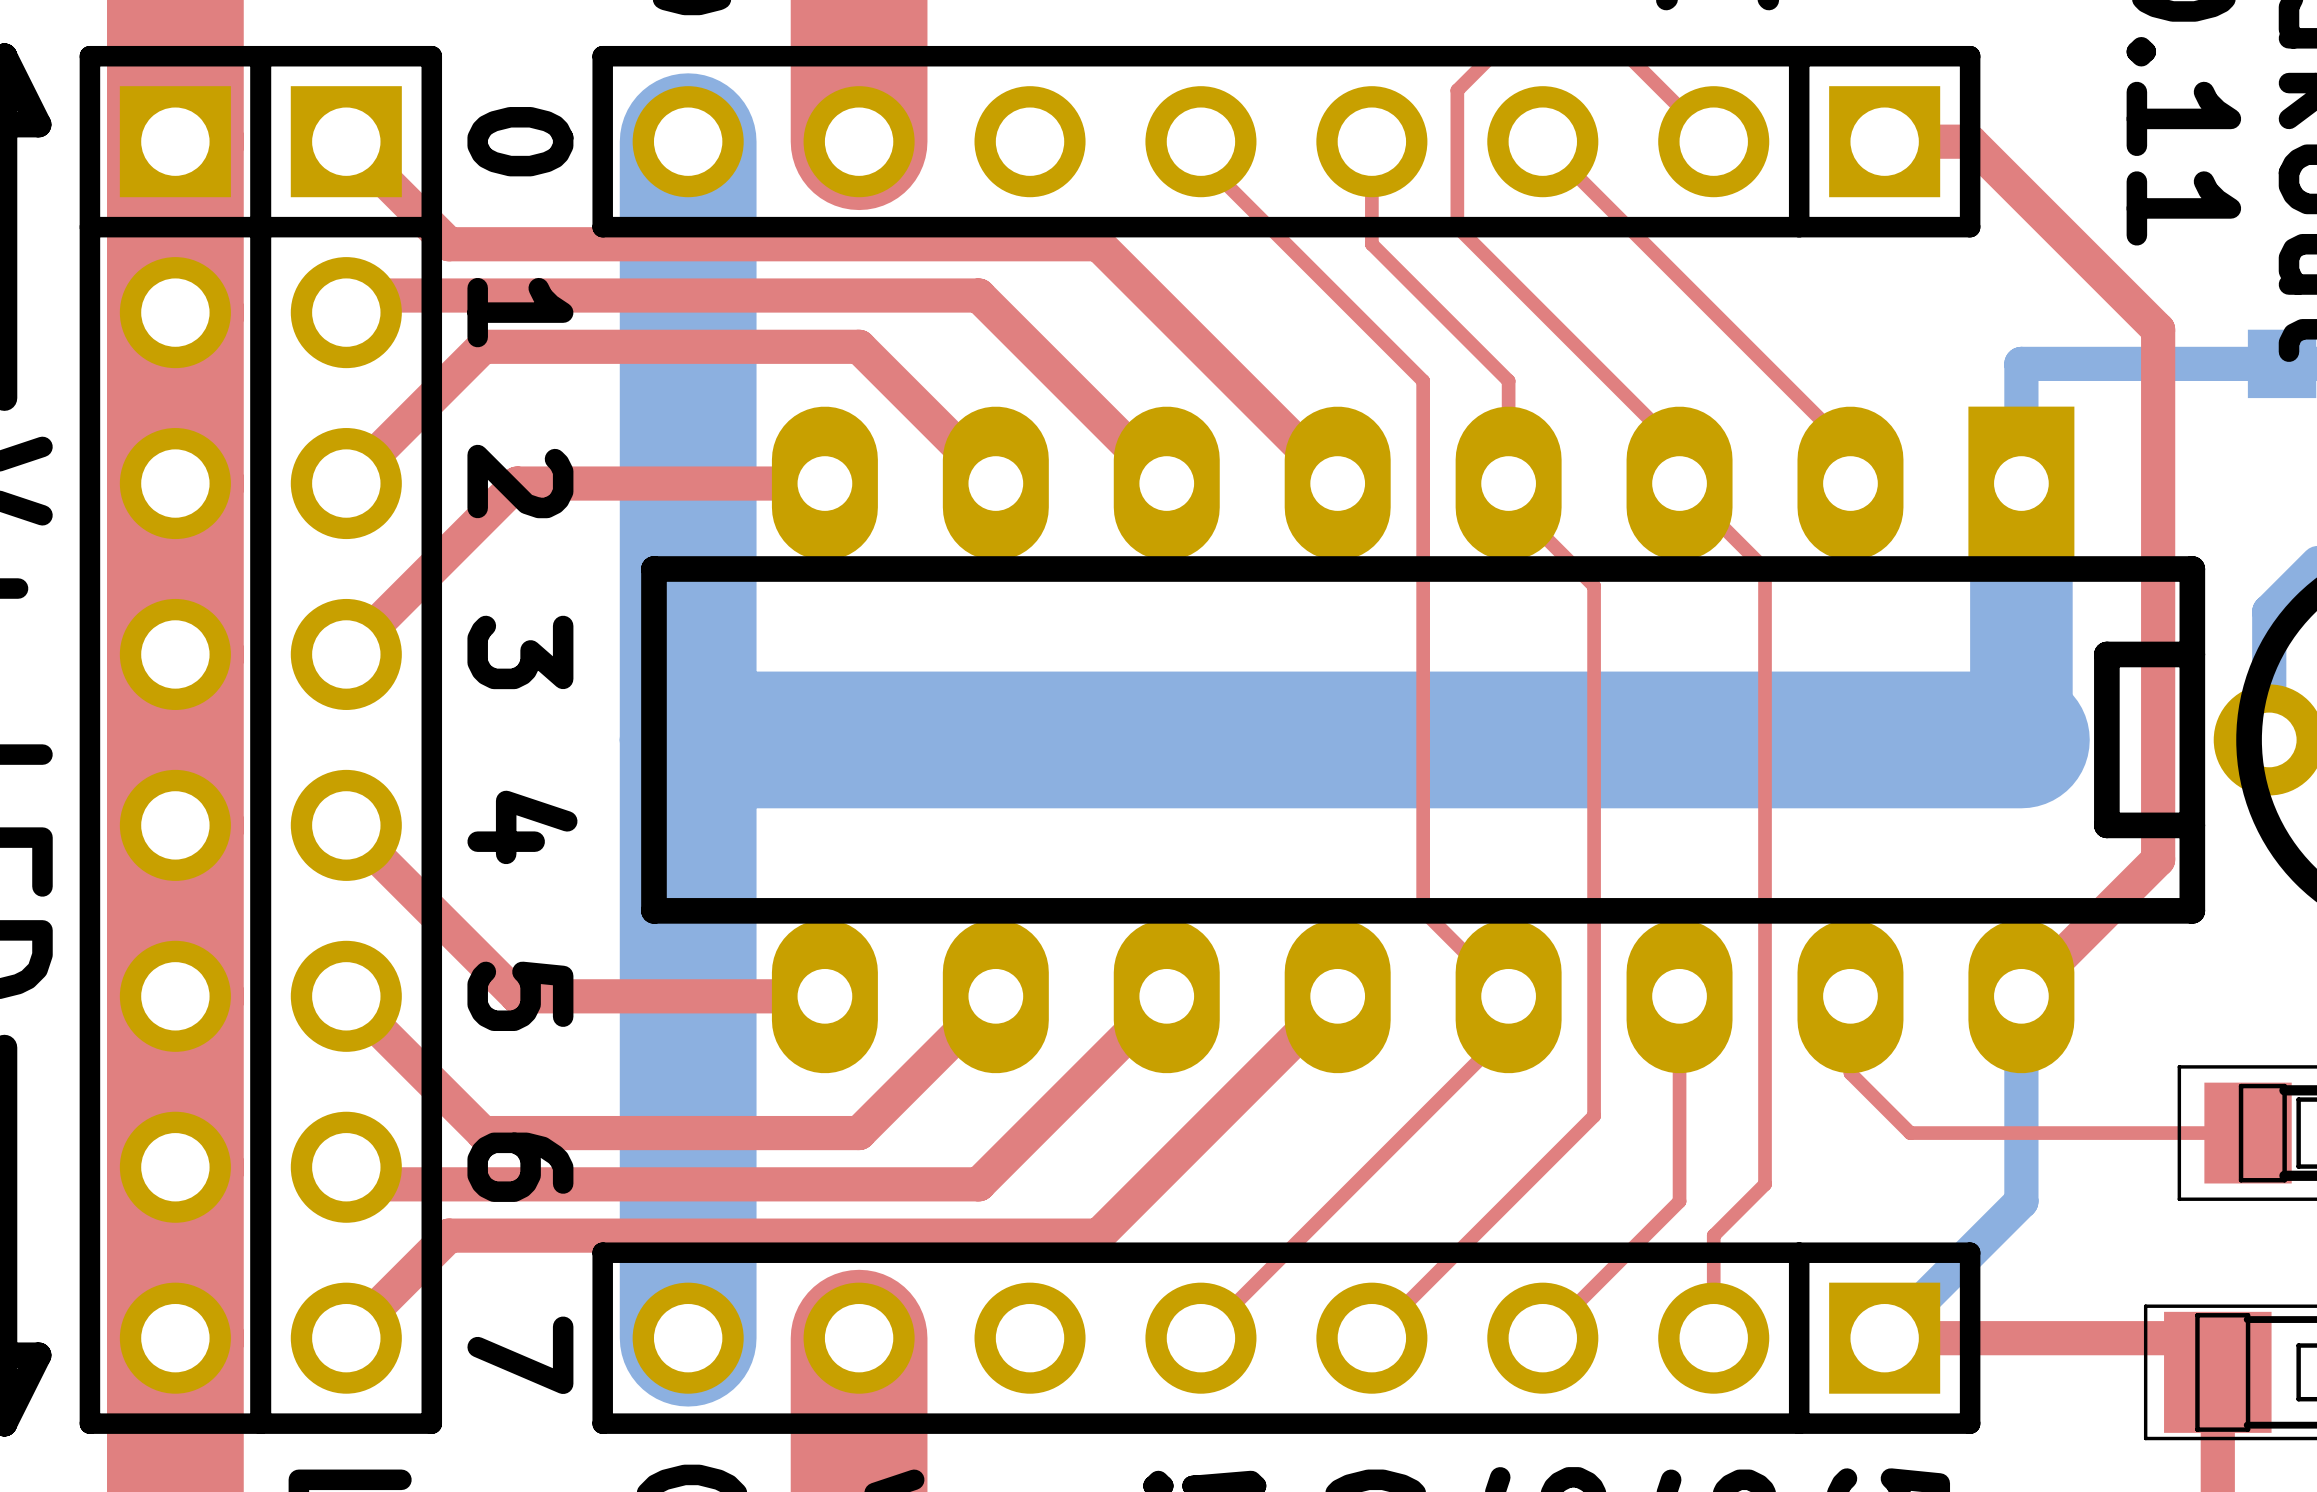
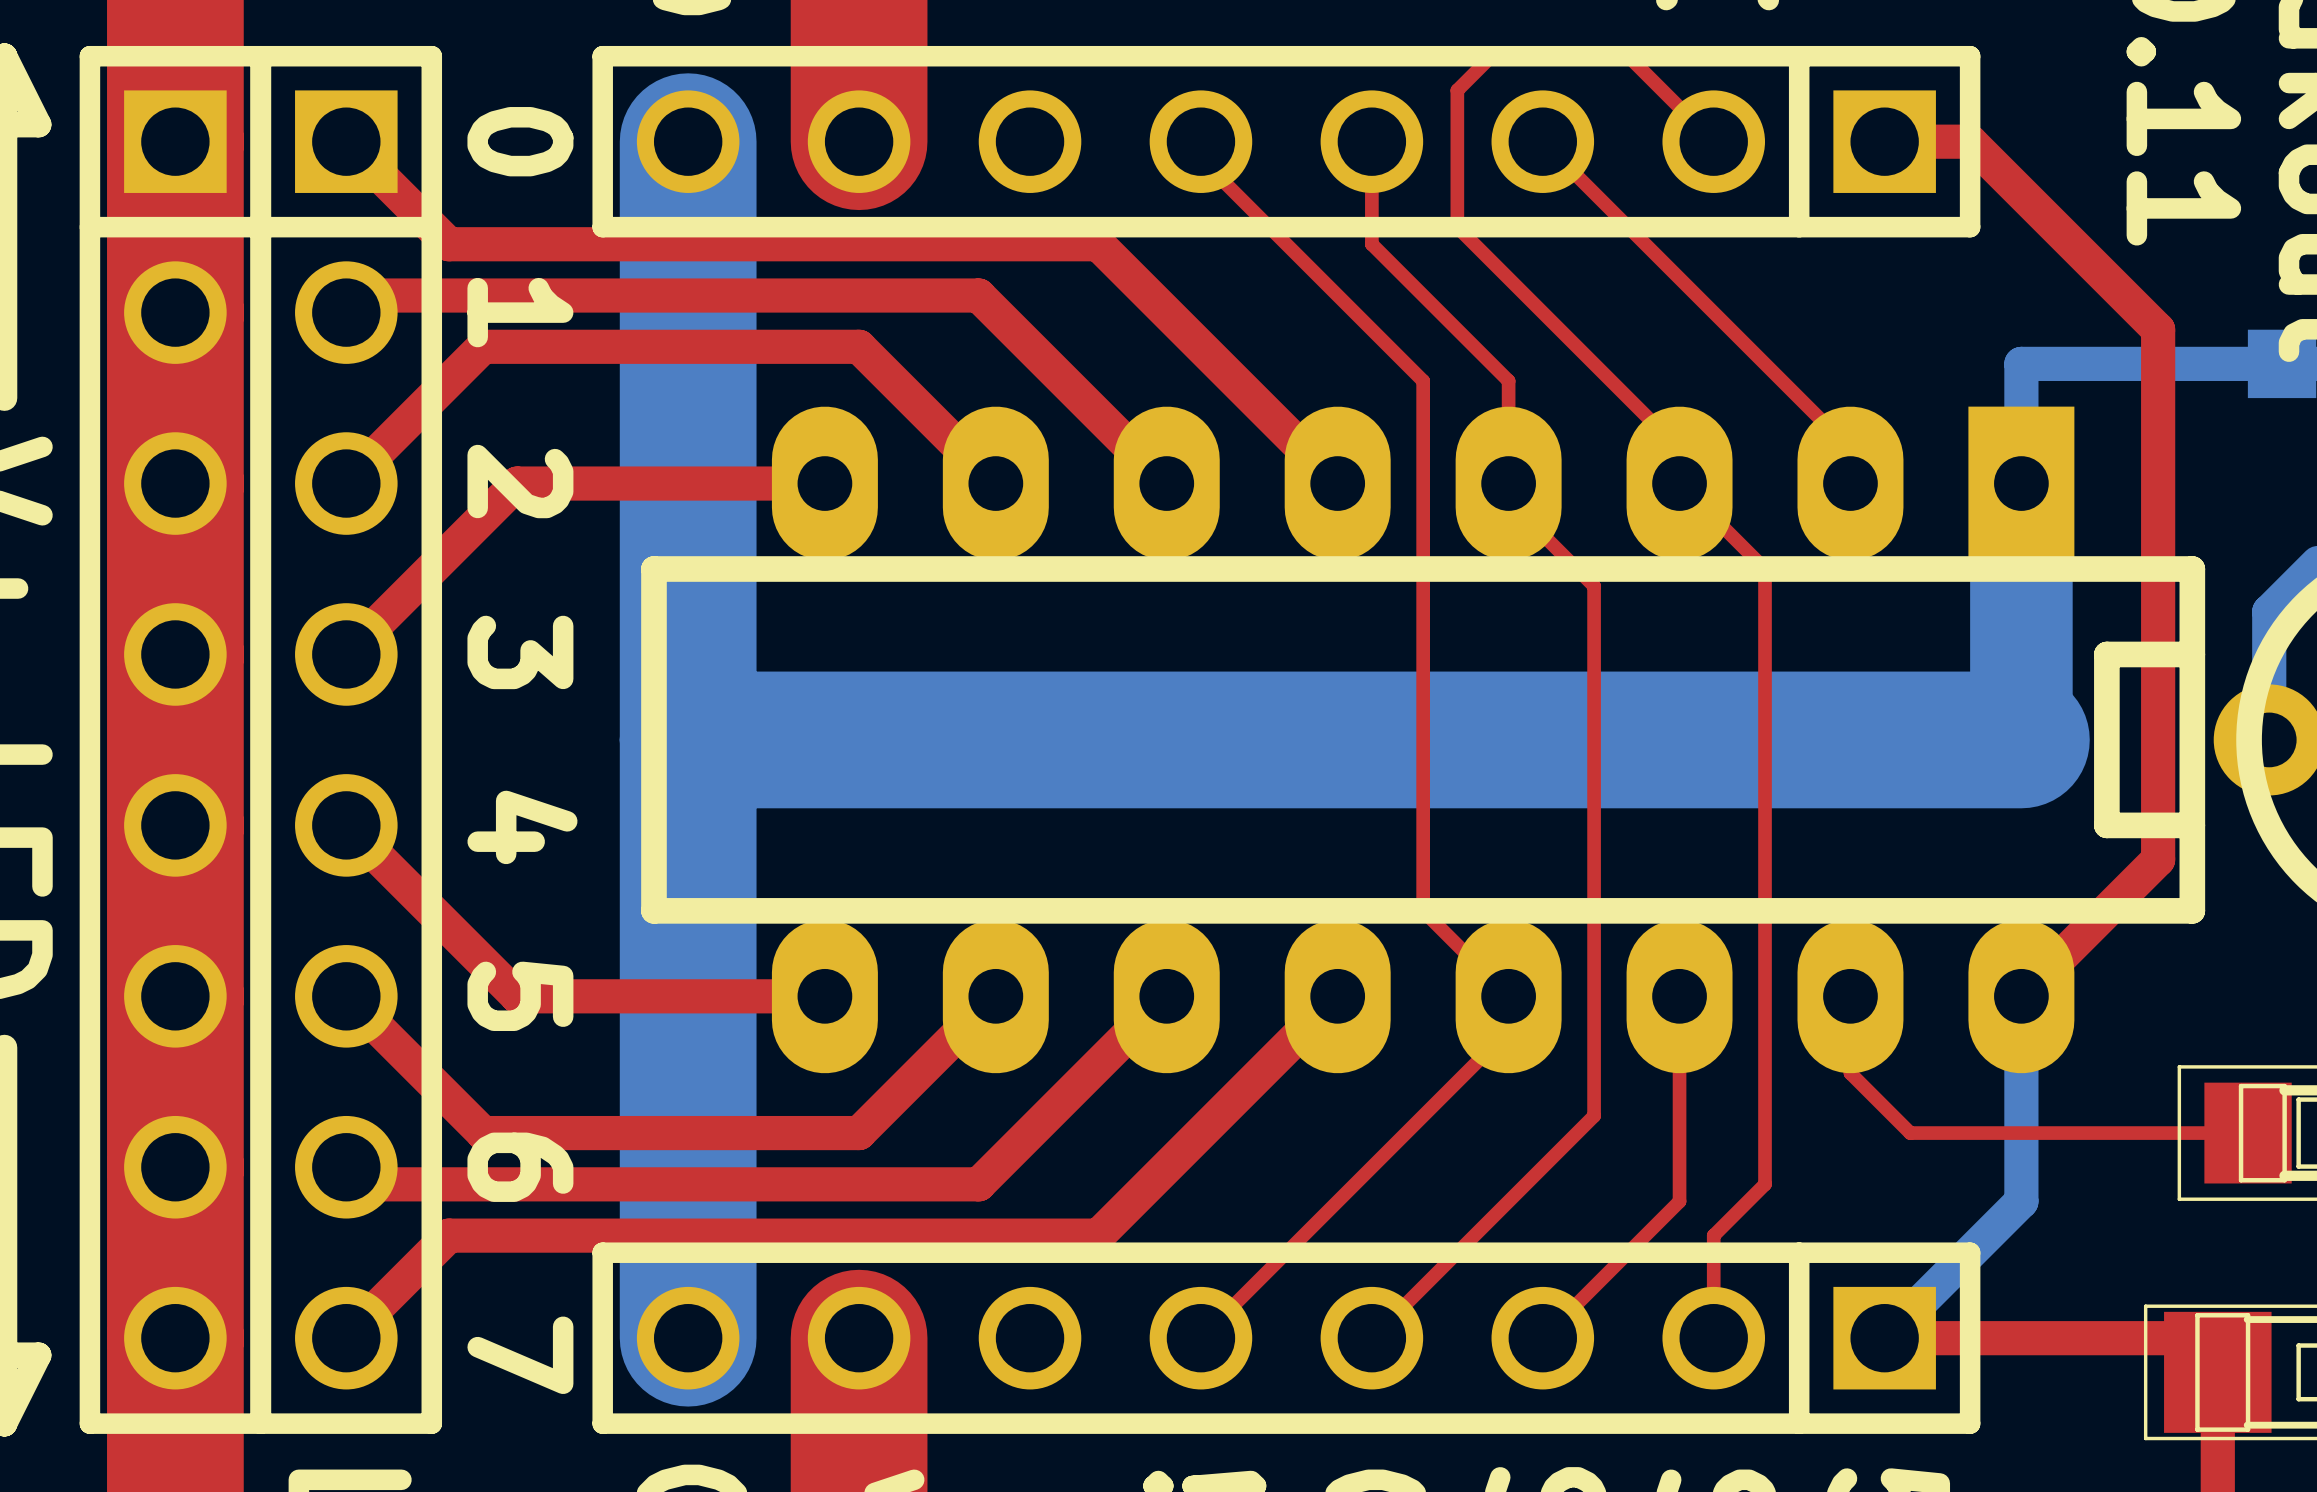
part footprint: [79, 45, 272, 1434] -> [79, 45, 272, 1434]
part footprint: [250, 45, 443, 1434] -> [250, 45, 443, 1434]
part footprint: [592, 45, 1981, 238] -> [592, 45, 1981, 238]
part footprint: [592, 1242, 1981, 1434] -> [592, 1242, 1981, 1434]

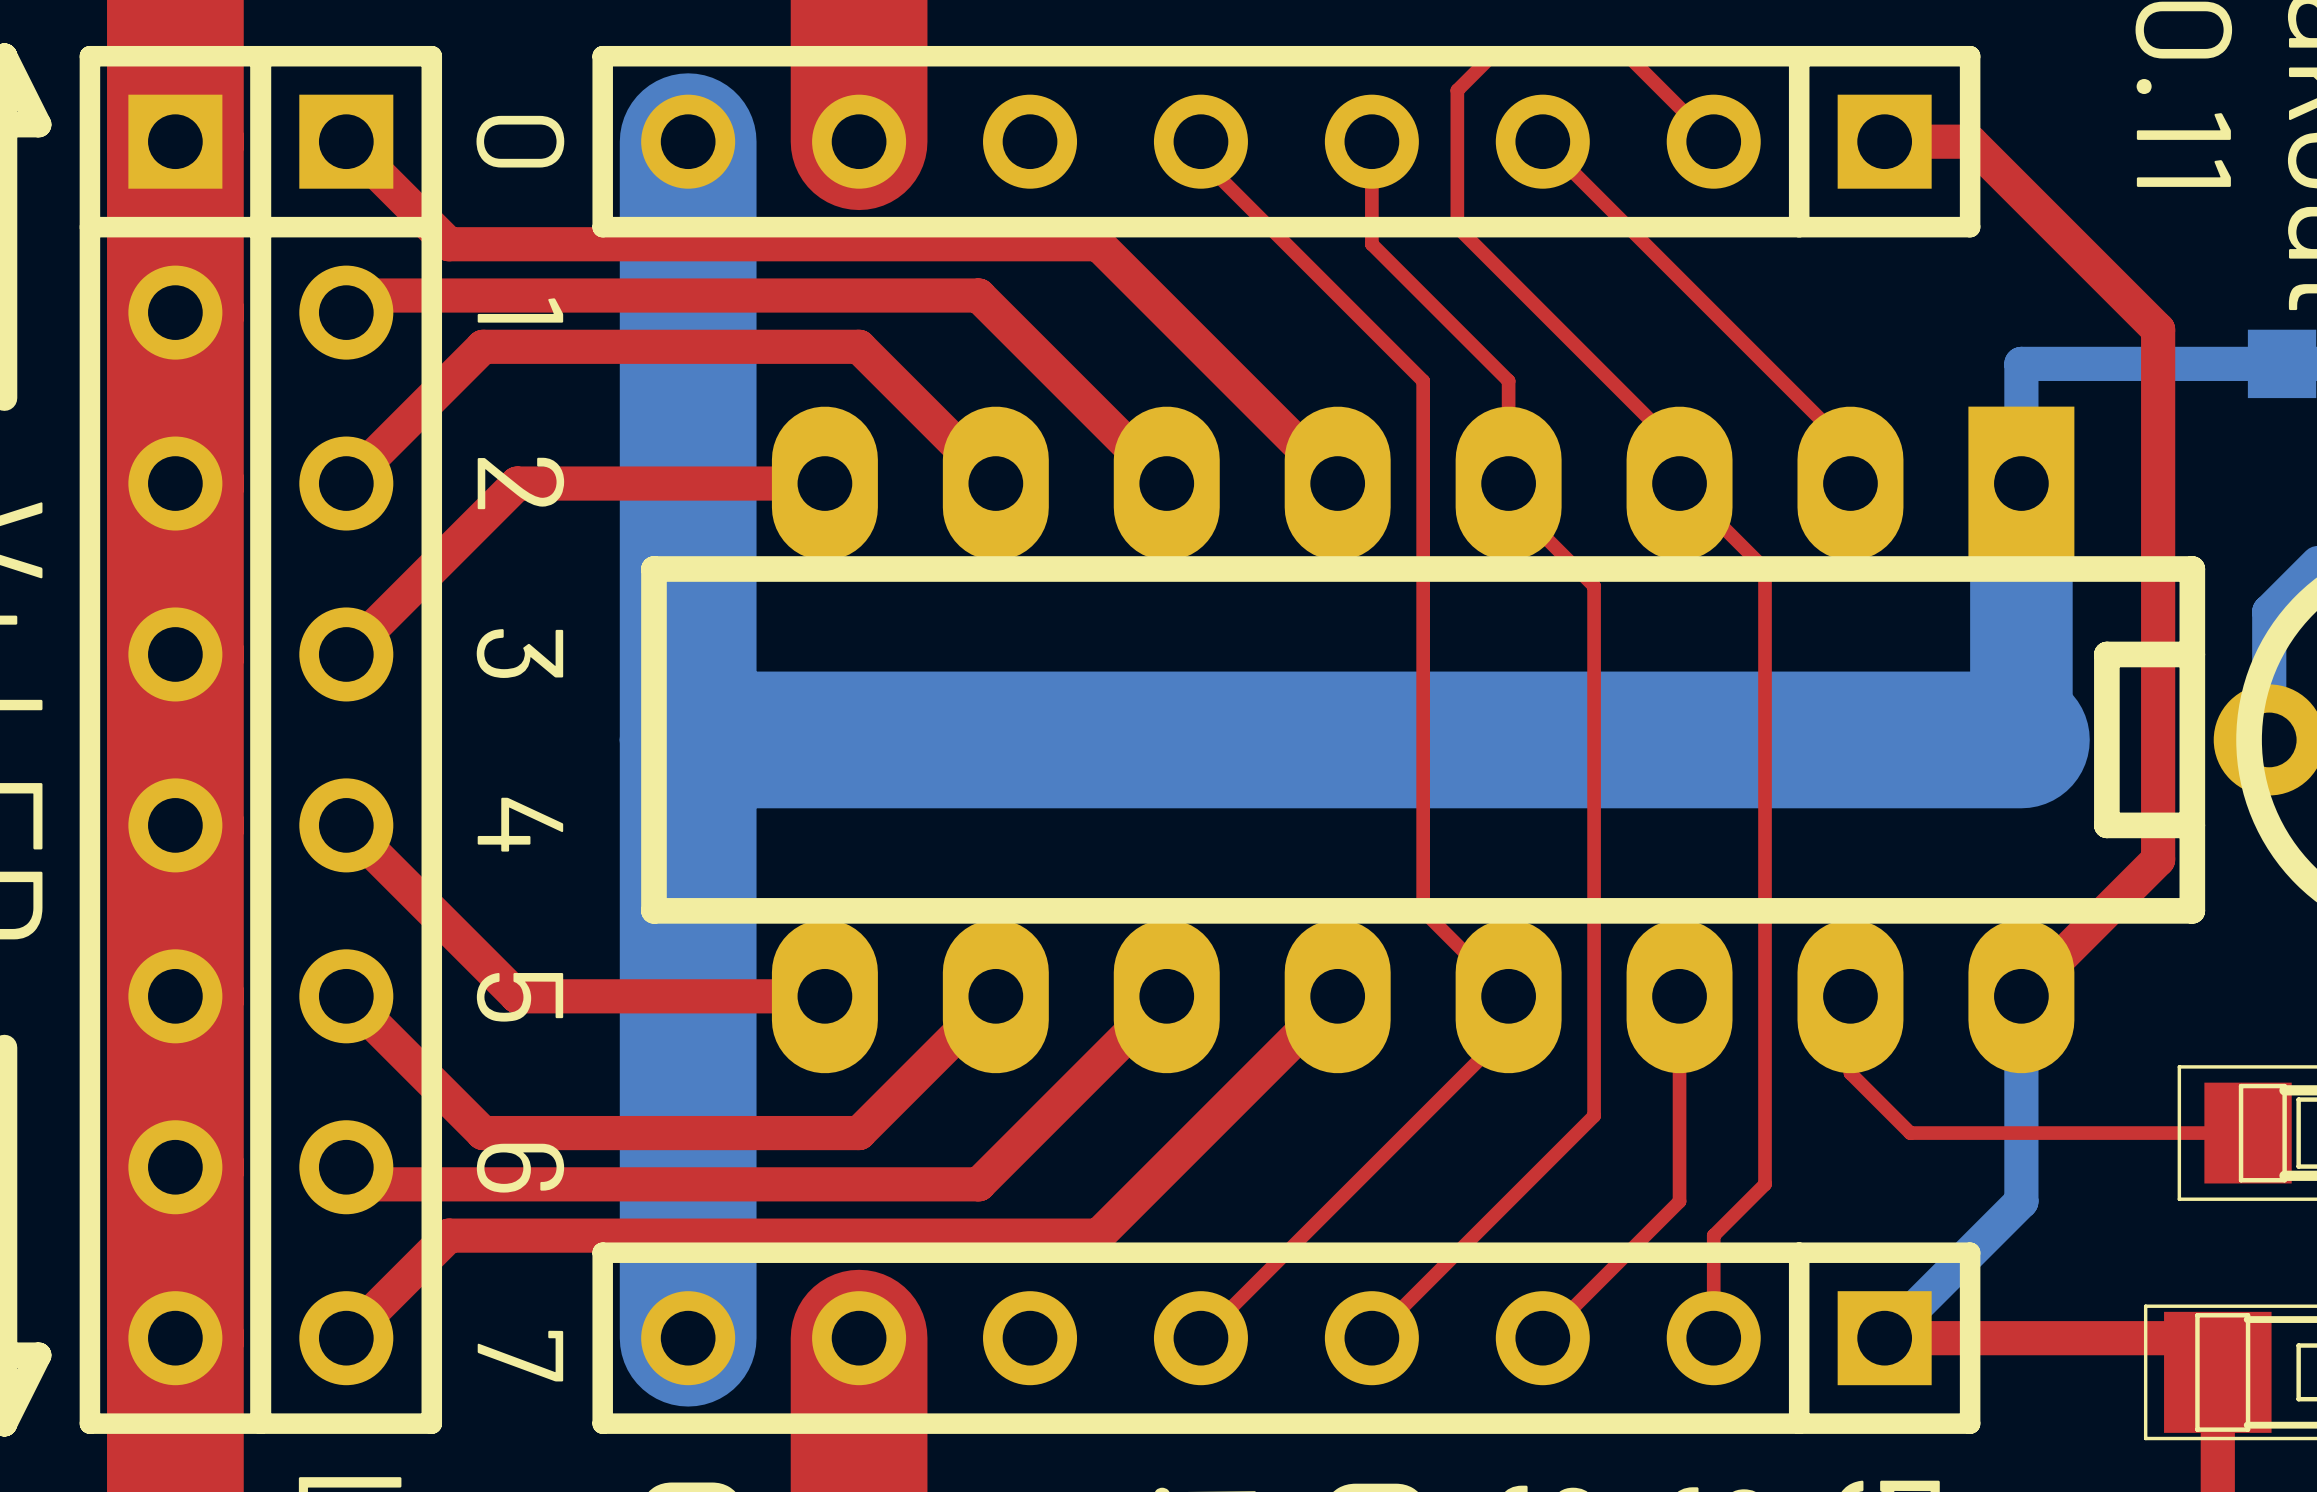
part footprint: [79, 45, 272, 1434] -> [79, 45, 272, 1434]
part footprint: [250, 45, 443, 1434] -> [250, 45, 443, 1434]
part footprint: [592, 45, 1981, 238] -> [592, 45, 1981, 238]
part footprint: [592, 1242, 1981, 1434] -> [592, 1242, 1981, 1434]

